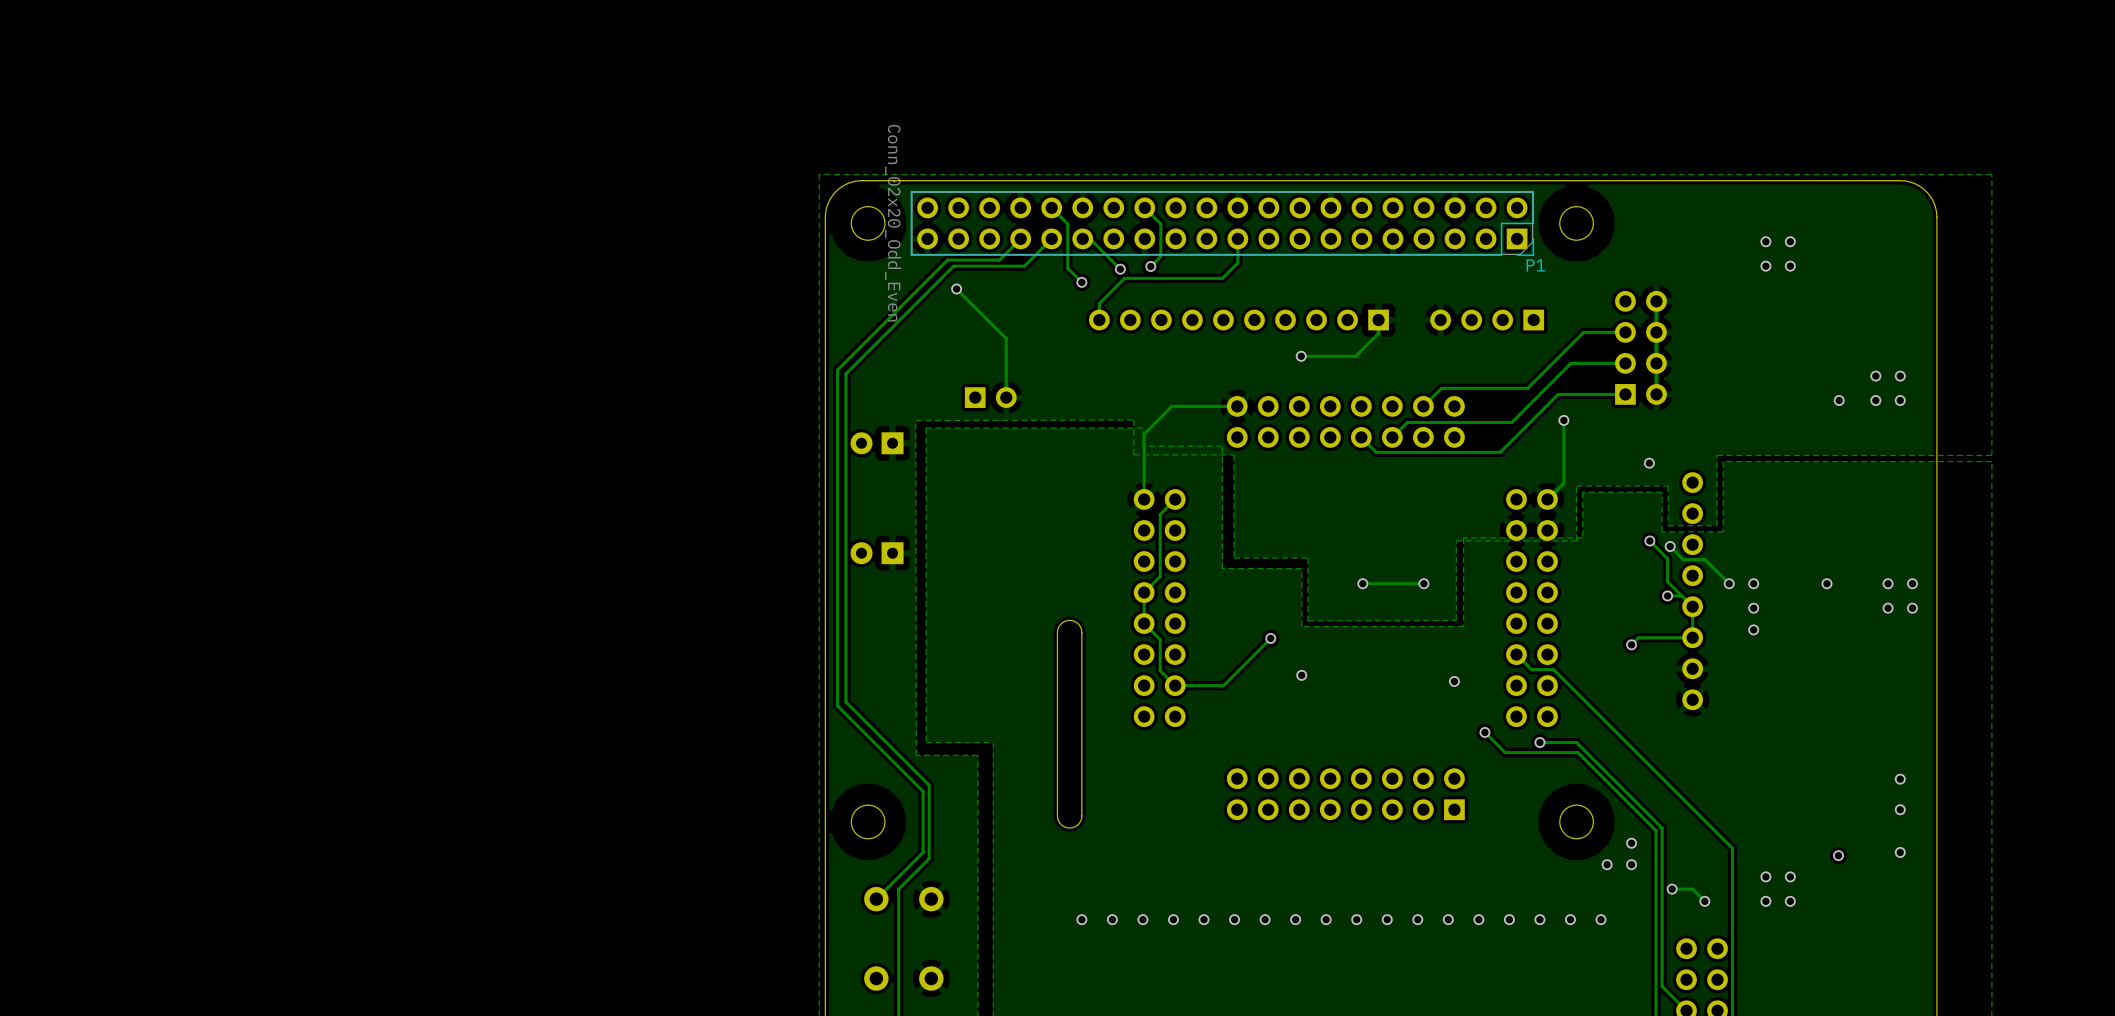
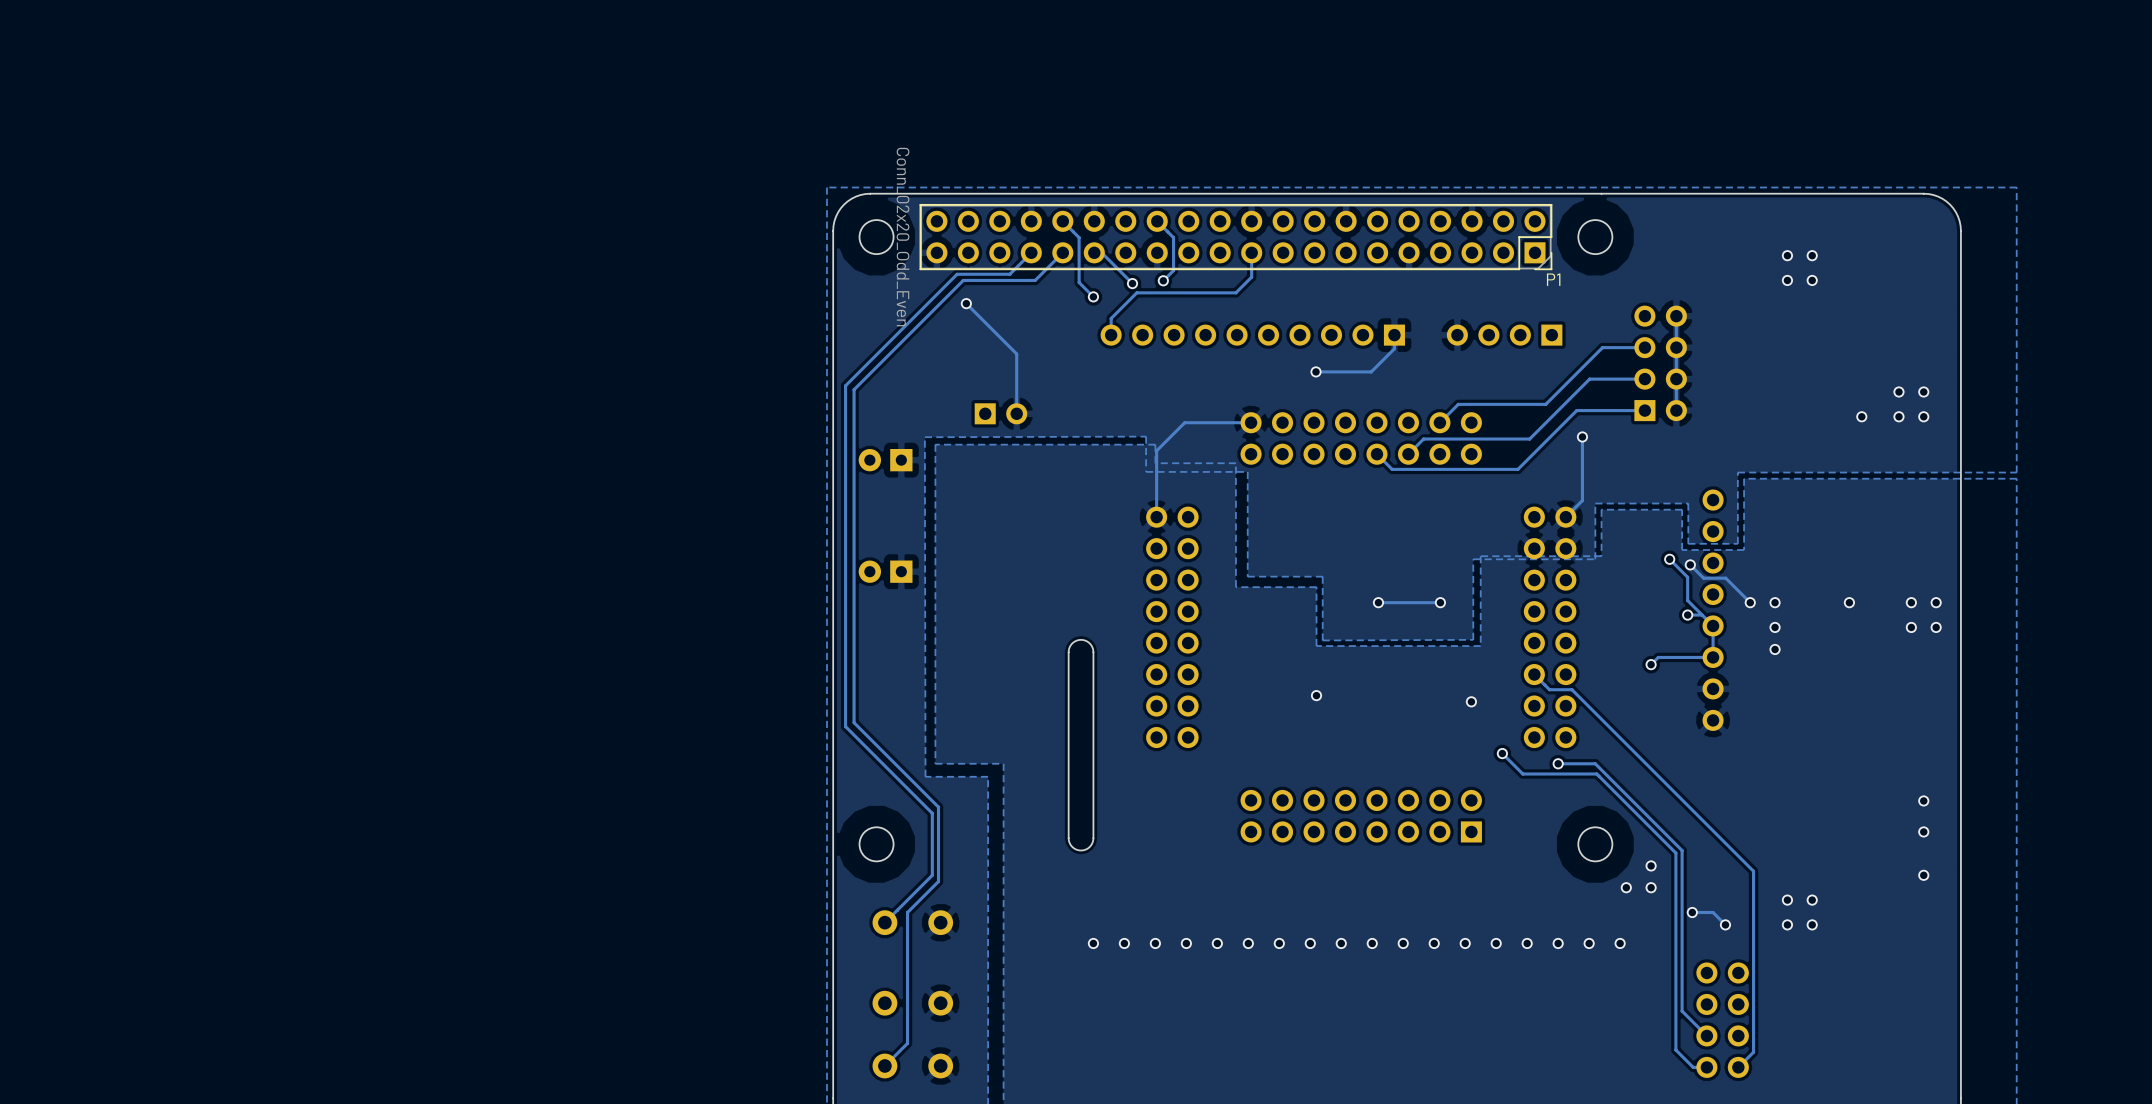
via: (1649, 463) -> none
track: (1175, 499) (1160, 514) (1160, 576) (1144, 592) (1144, 623) (1160, 639) (1160, 670) (1175, 685) (1223, 685) (1270, 638) -> none
via: (1270, 638) -> none
via: (1838, 855) -> none

